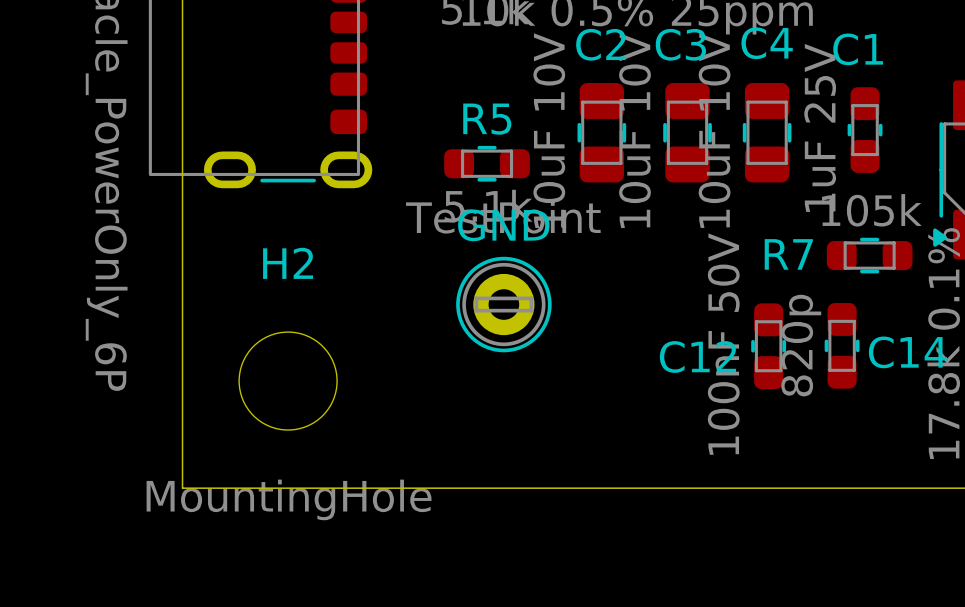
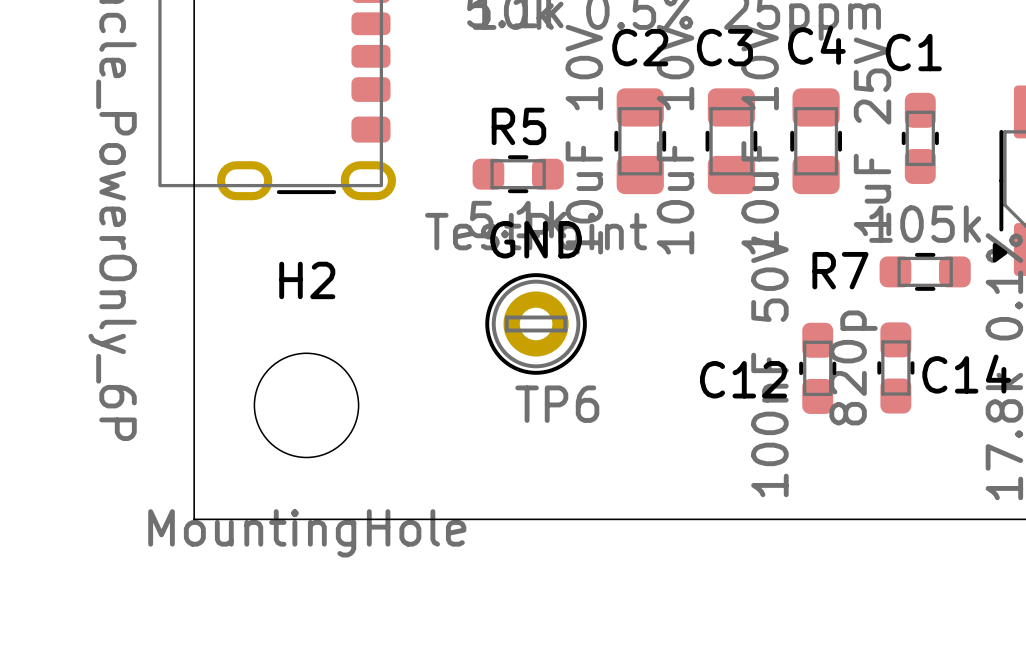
TP6 name: none -> TP6 (557, 404)

